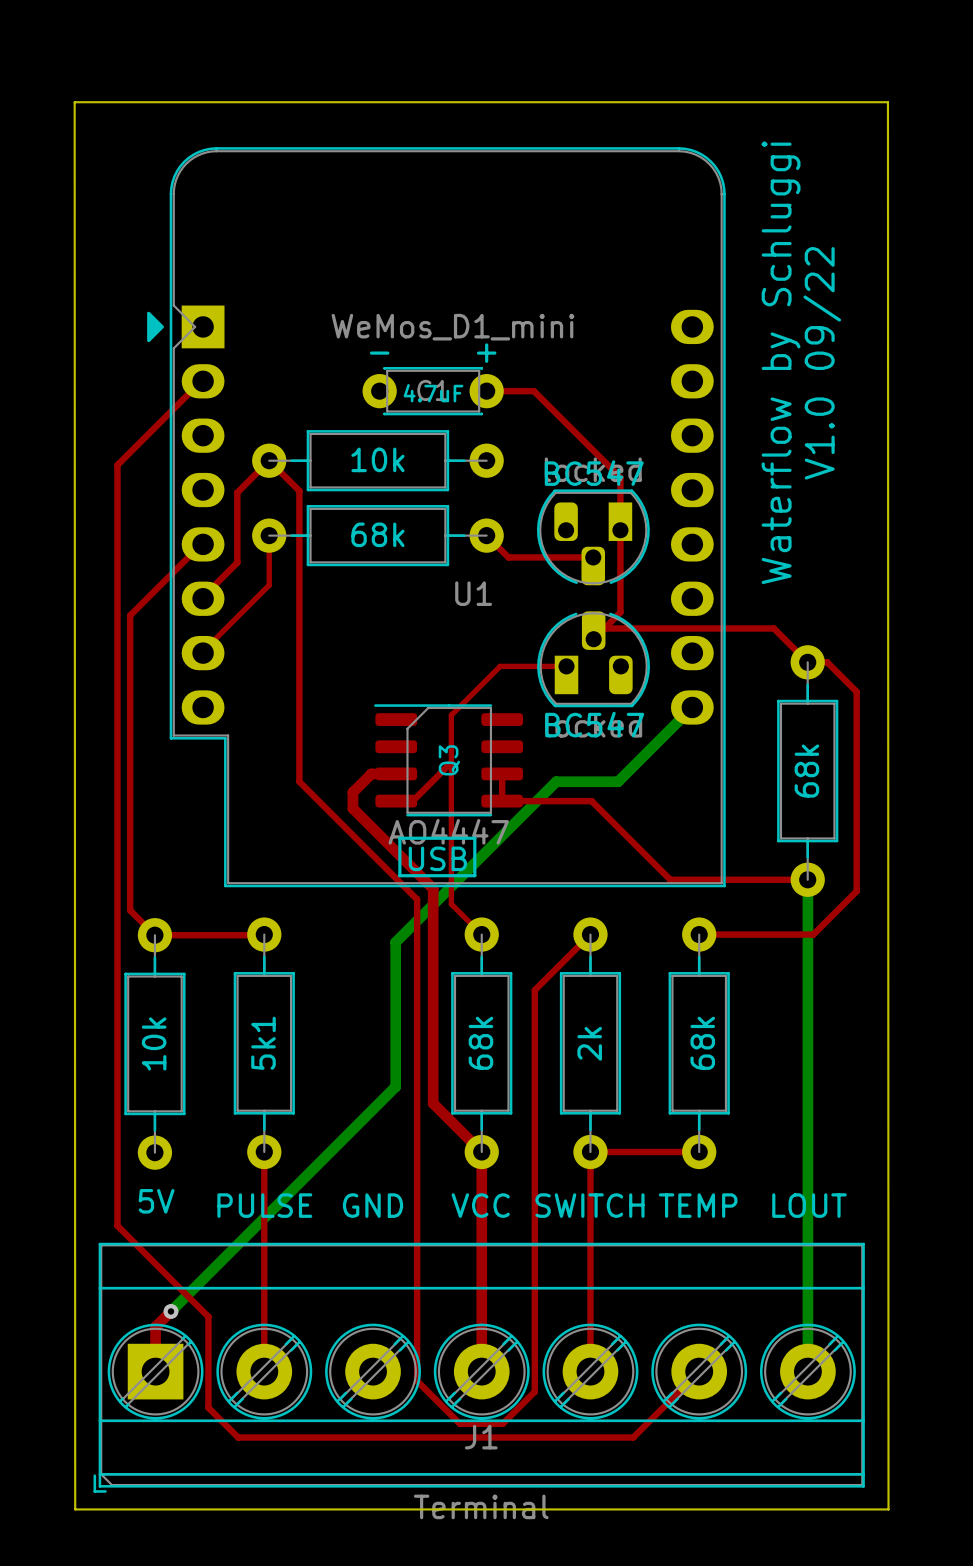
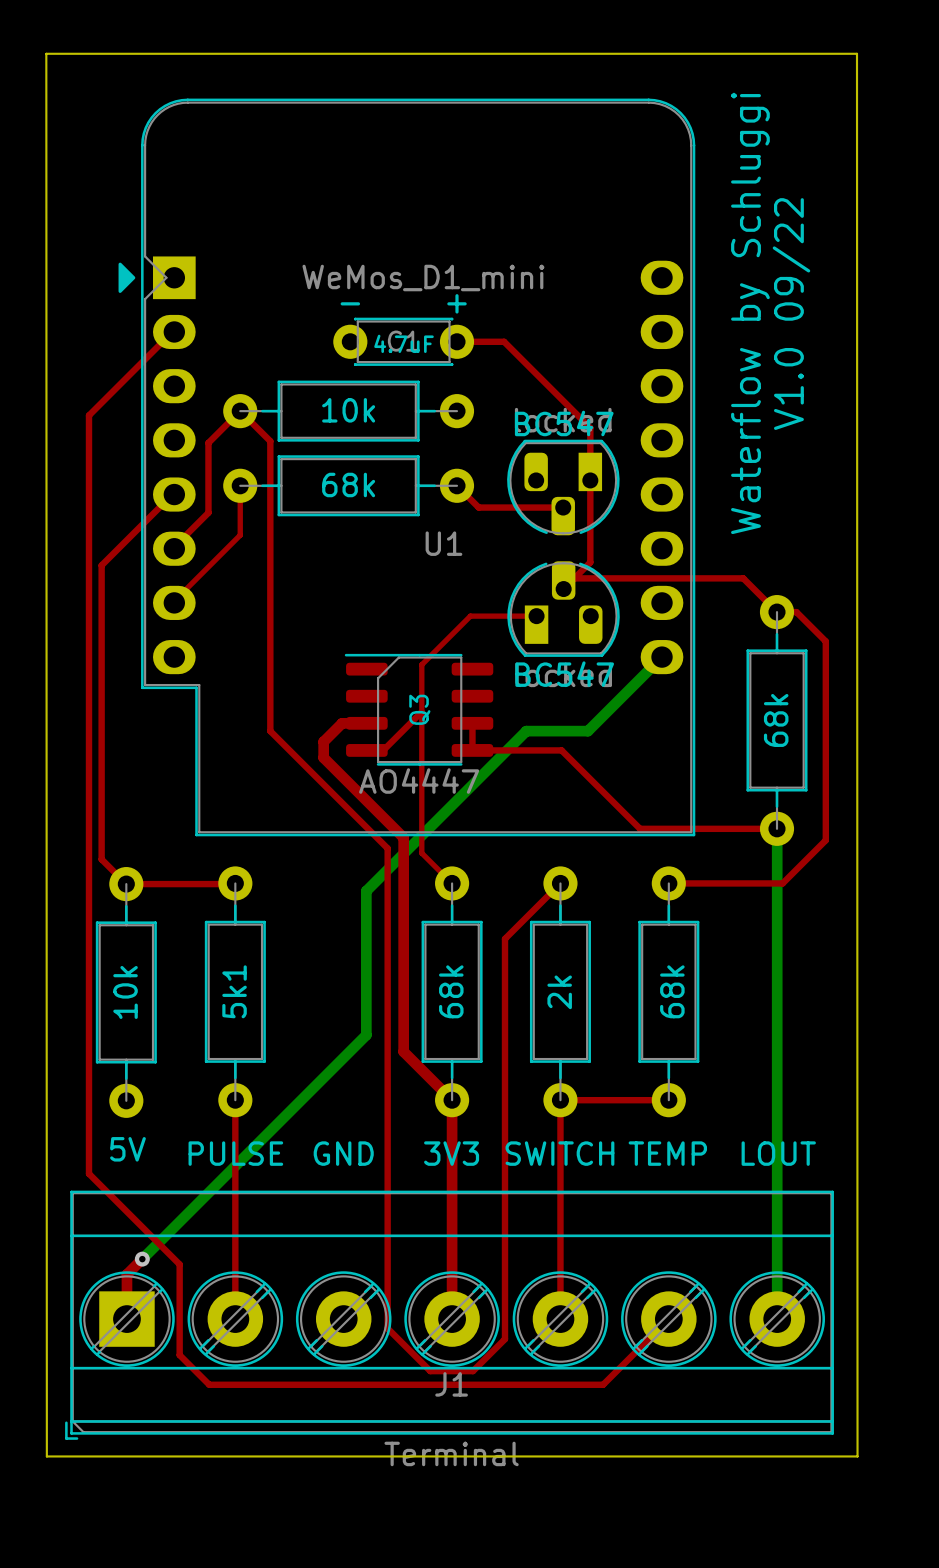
line: (399, 838) (474, 838) (474, 875) (399, 875) (399, 838) -> none
text: USB (437, 858) -> none
text: VCC (480, 1205) -> 3V3 (451, 1153)

